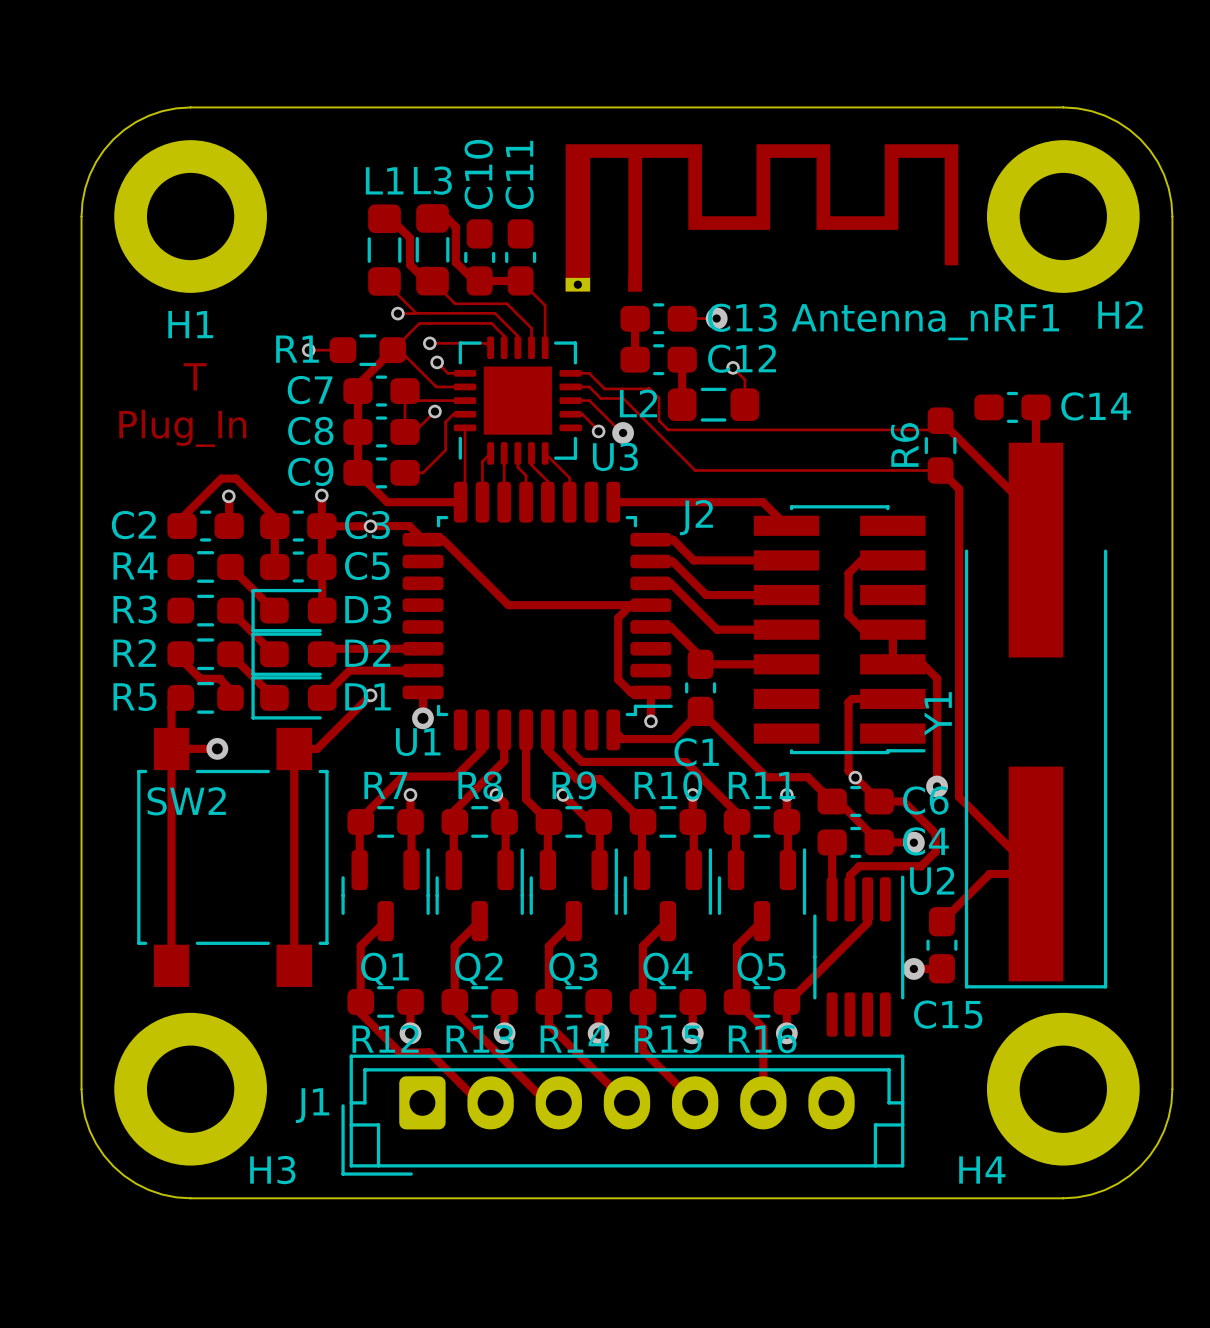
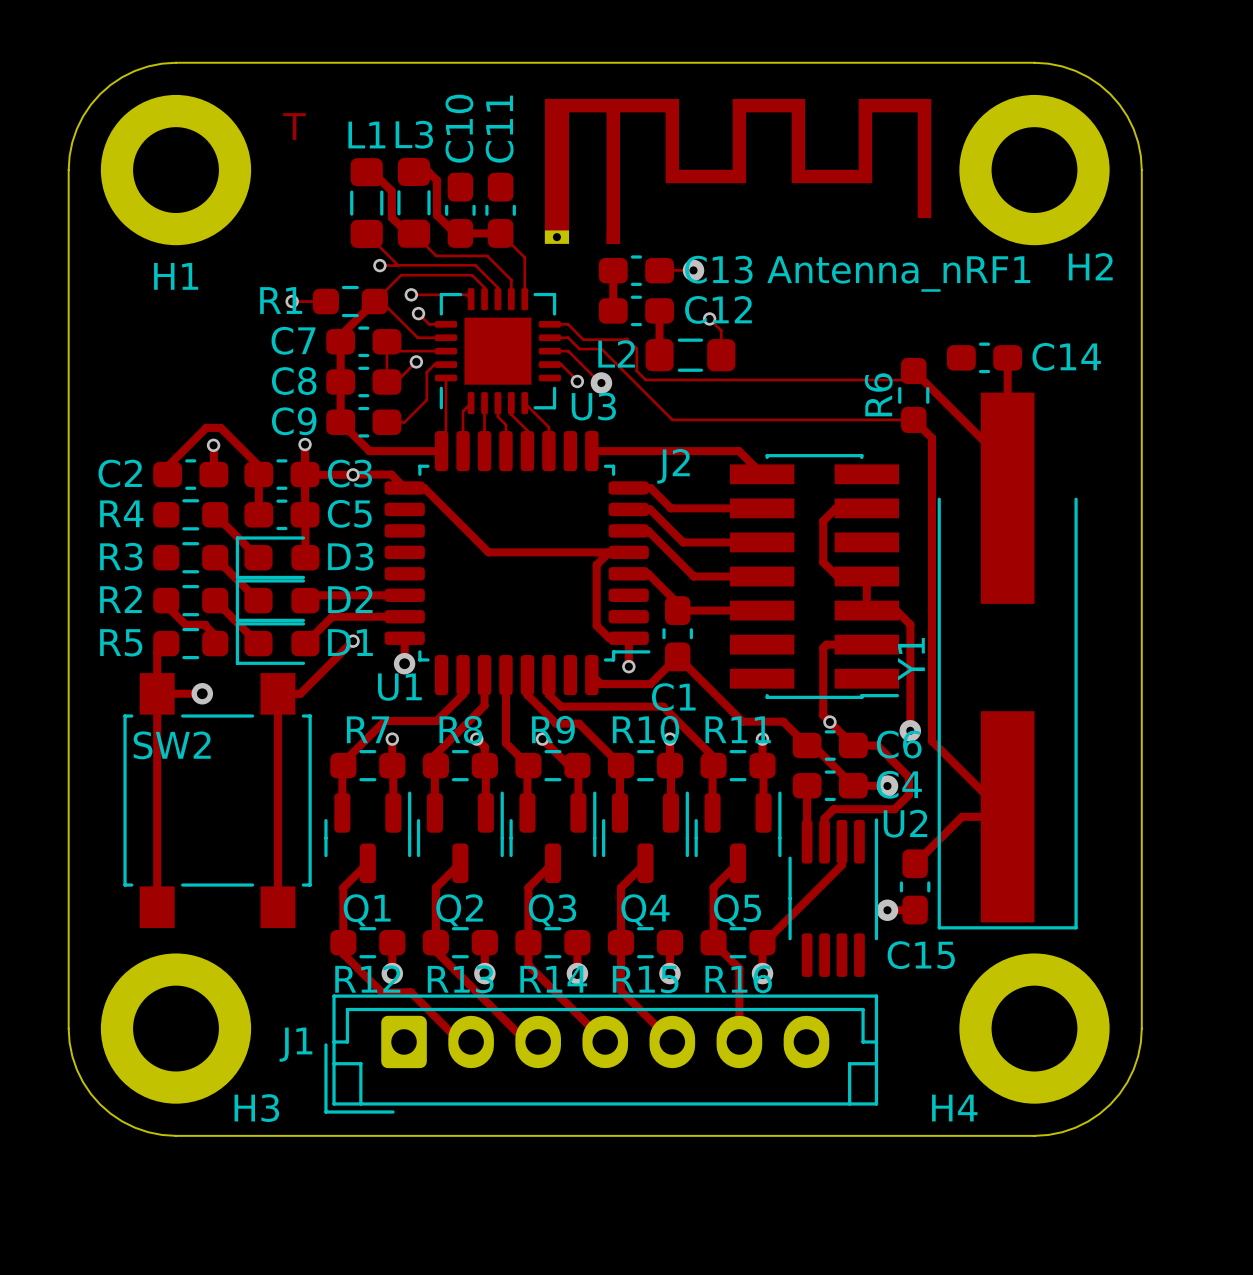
text position: T (195, 376) -> T (294, 126)
text: Plug_In (182, 428) -> none

